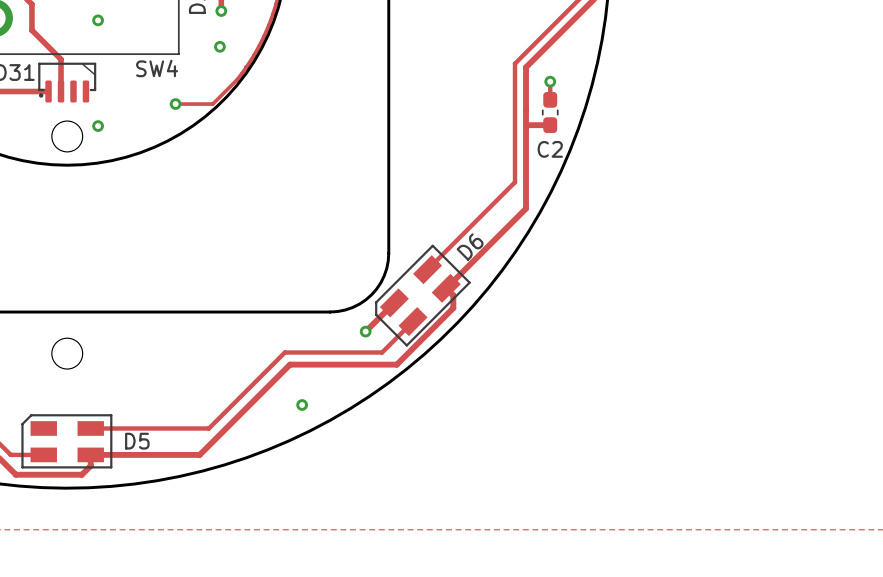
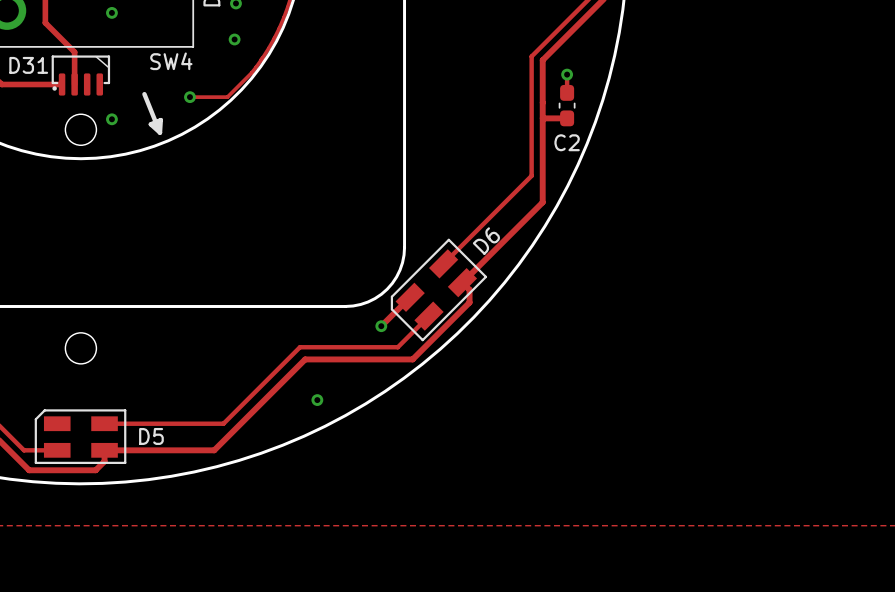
line: none -> (144, 94) (159, 132)
line: none -> (159, 132) (160, 120) (150, 124) (159, 132)

